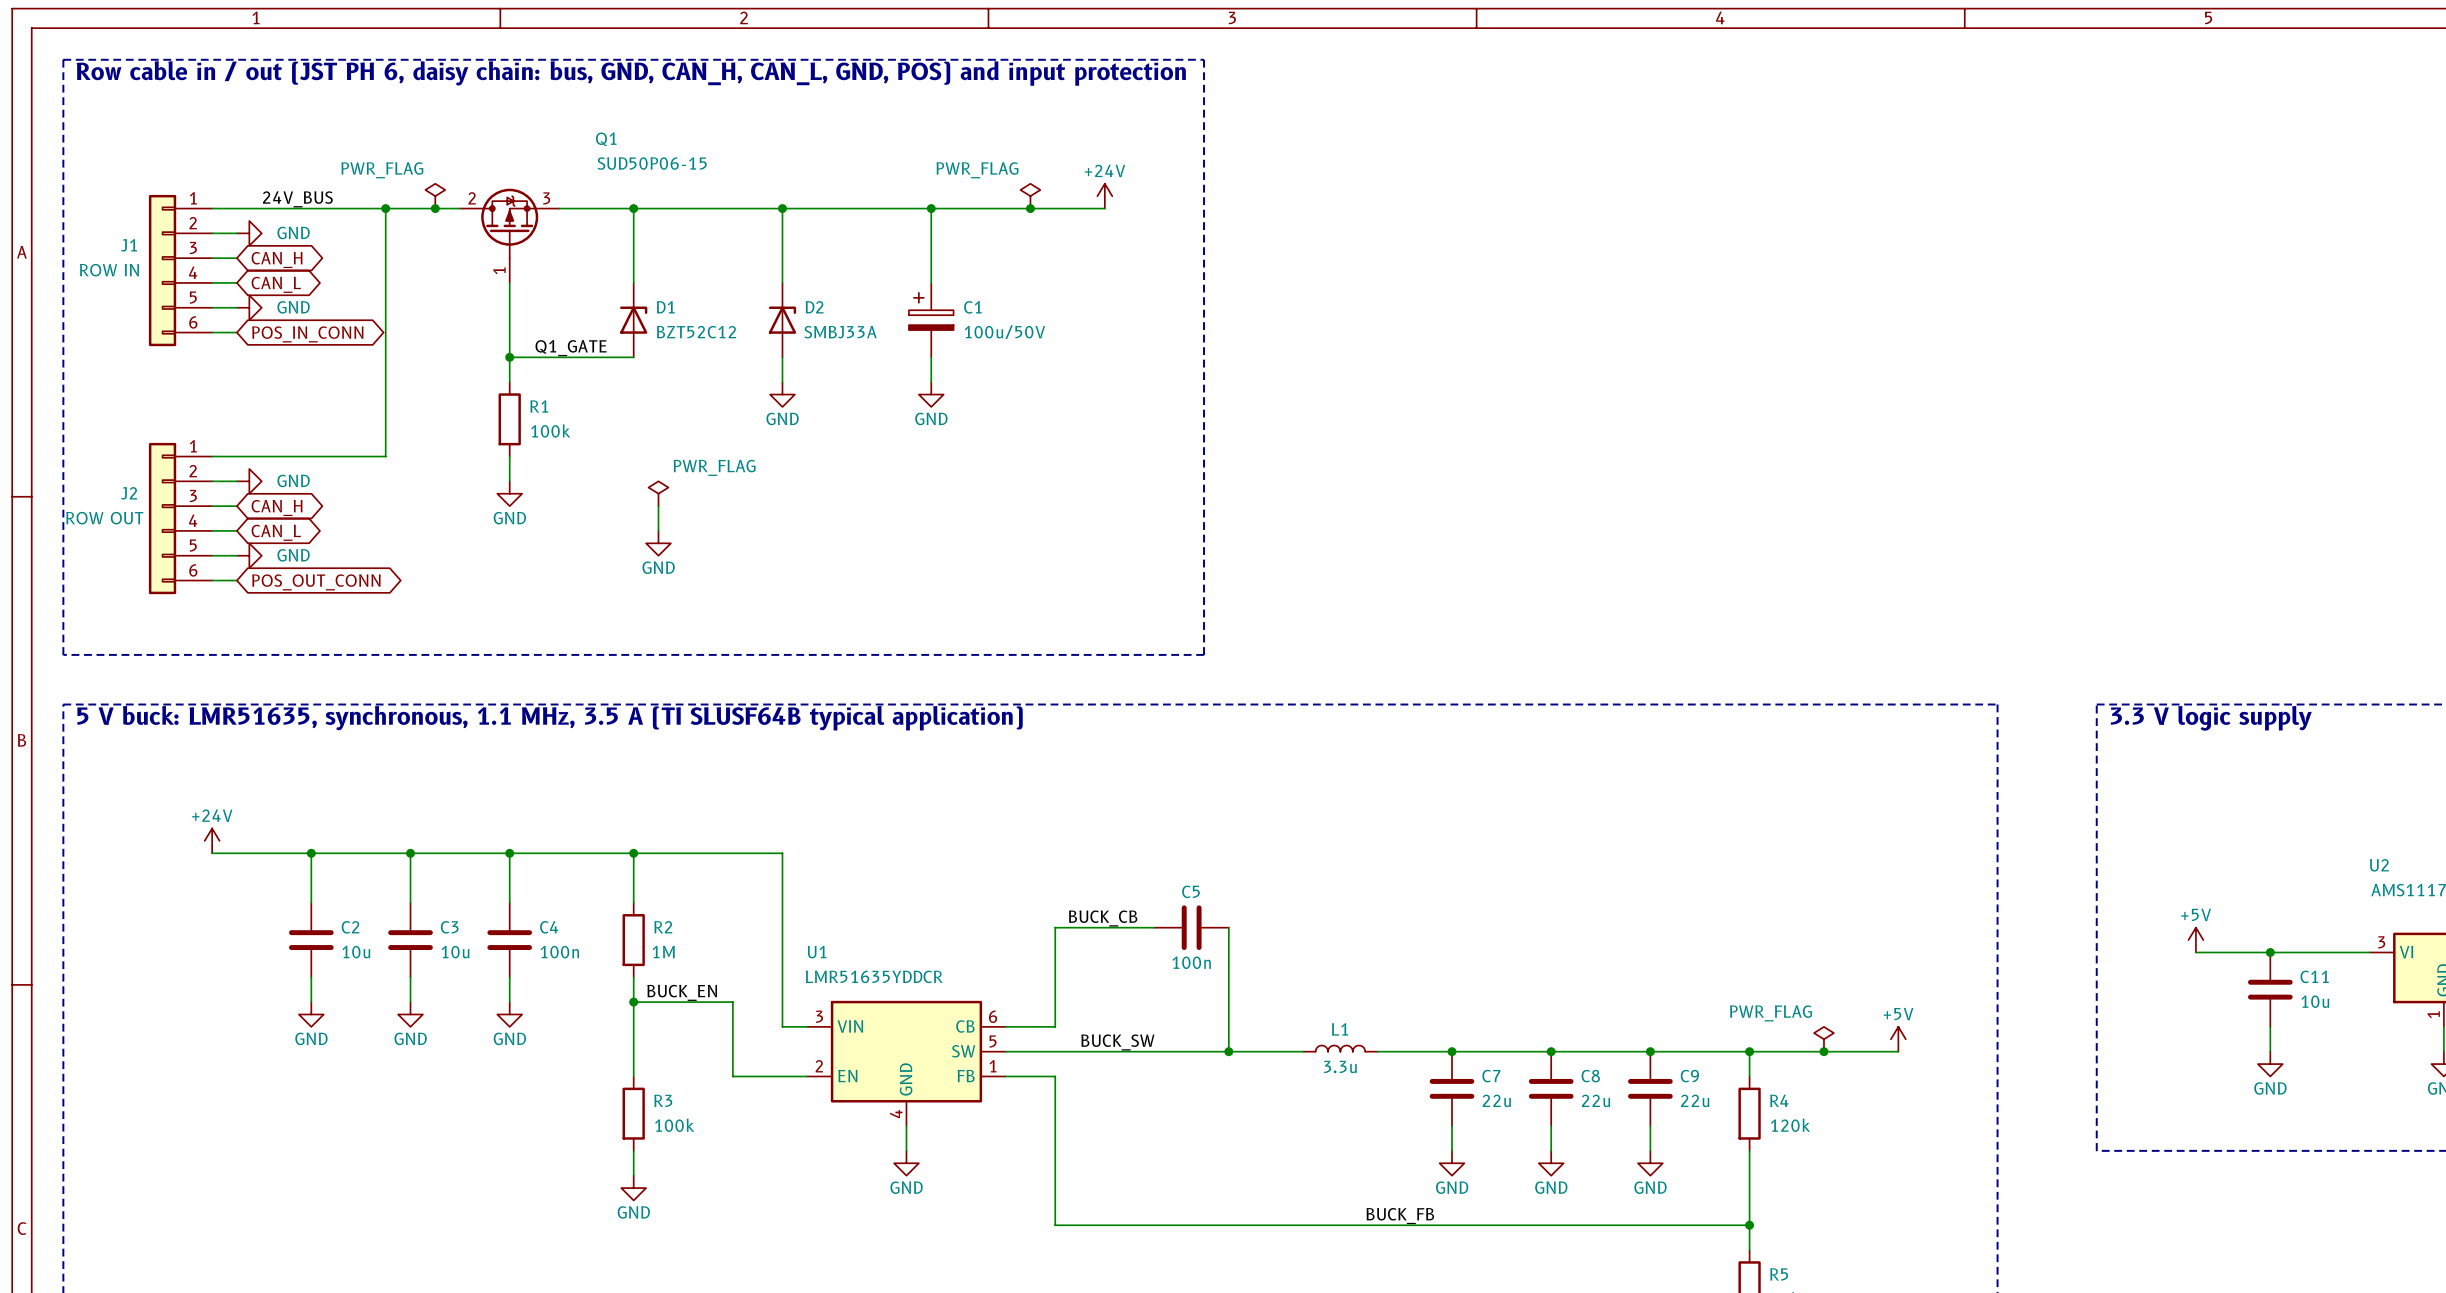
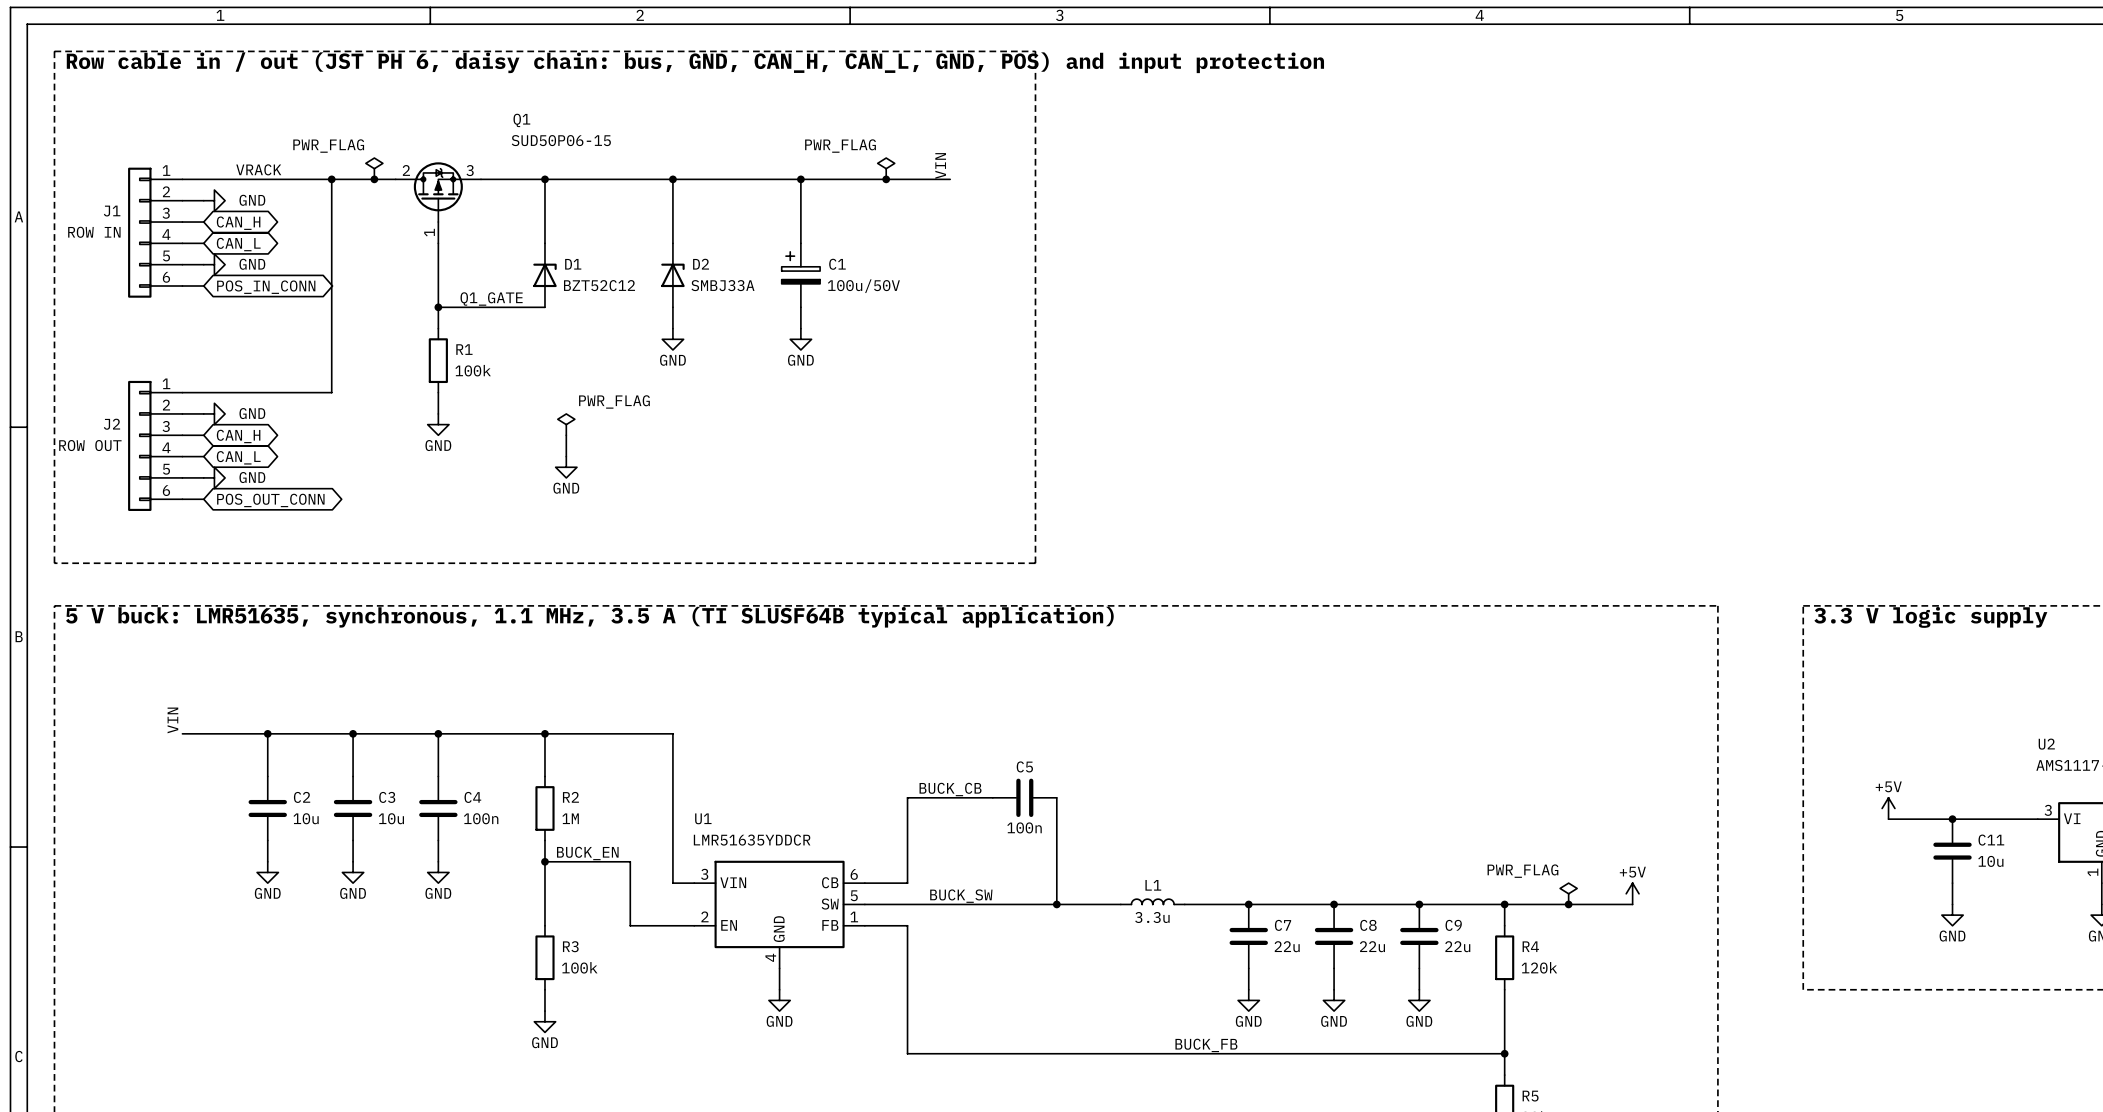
label: none -> VIN (940, 165)
power symbol: +24V (1104, 196) -> none
label: none -> VRACK (258, 169)
label: 24V_BUS (297, 199) -> none
label: none -> VIN (172, 720)
power symbol: +24V (212, 840) -> none

